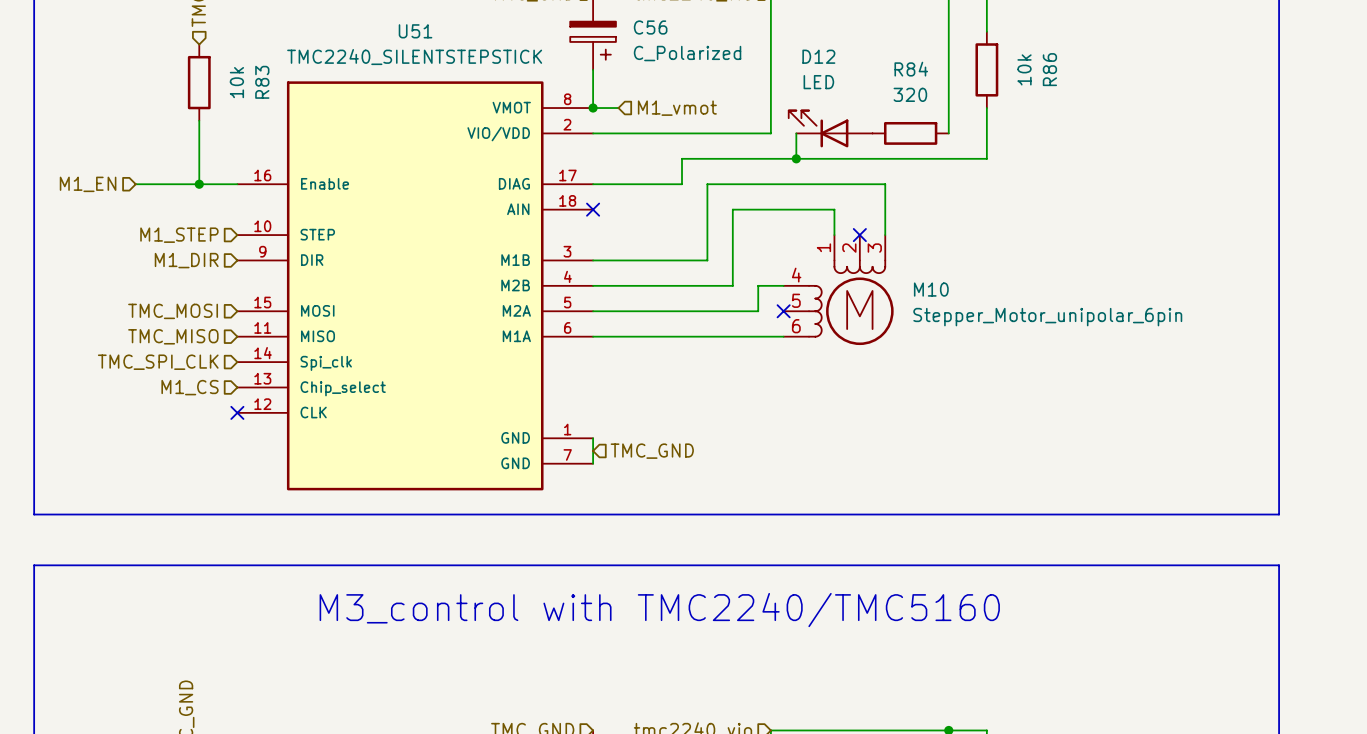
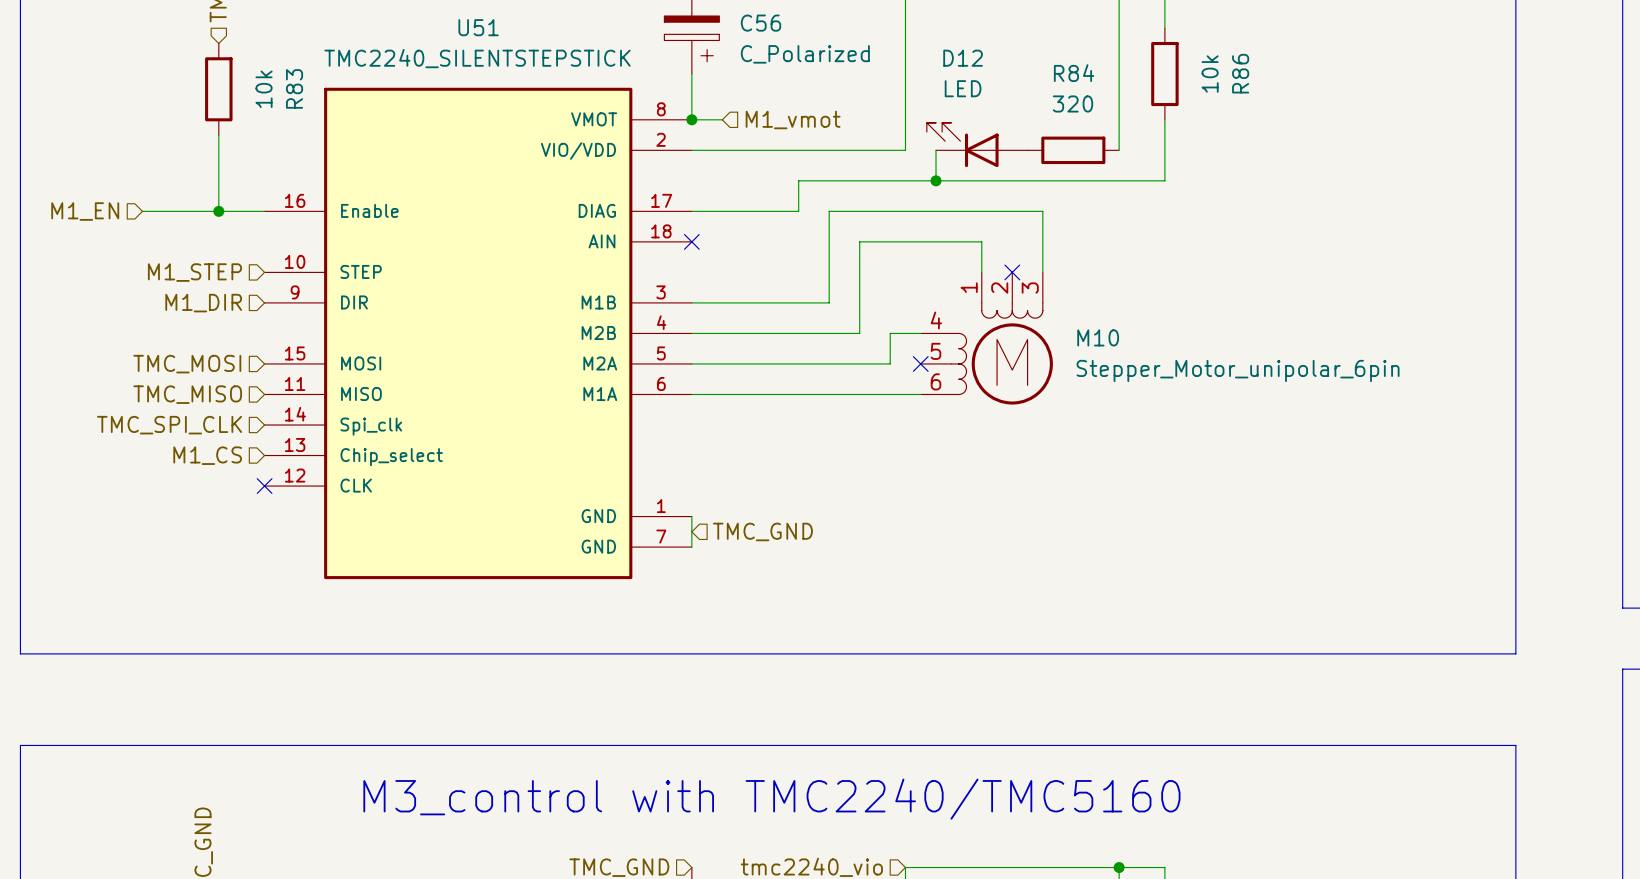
line: (34, 514) (1279, 514) -> (20, 608) (20, 653) (1515, 653) (1515, 608)
text position: M3_control with TMC2240/TMC5160 (659, 610) -> M3_control with TMC2240/TMC5160 (771, 799)
line: (34, 628) (34, 565) (1279, 565) (1279, 628) -> (20, 745) (1515, 745)

